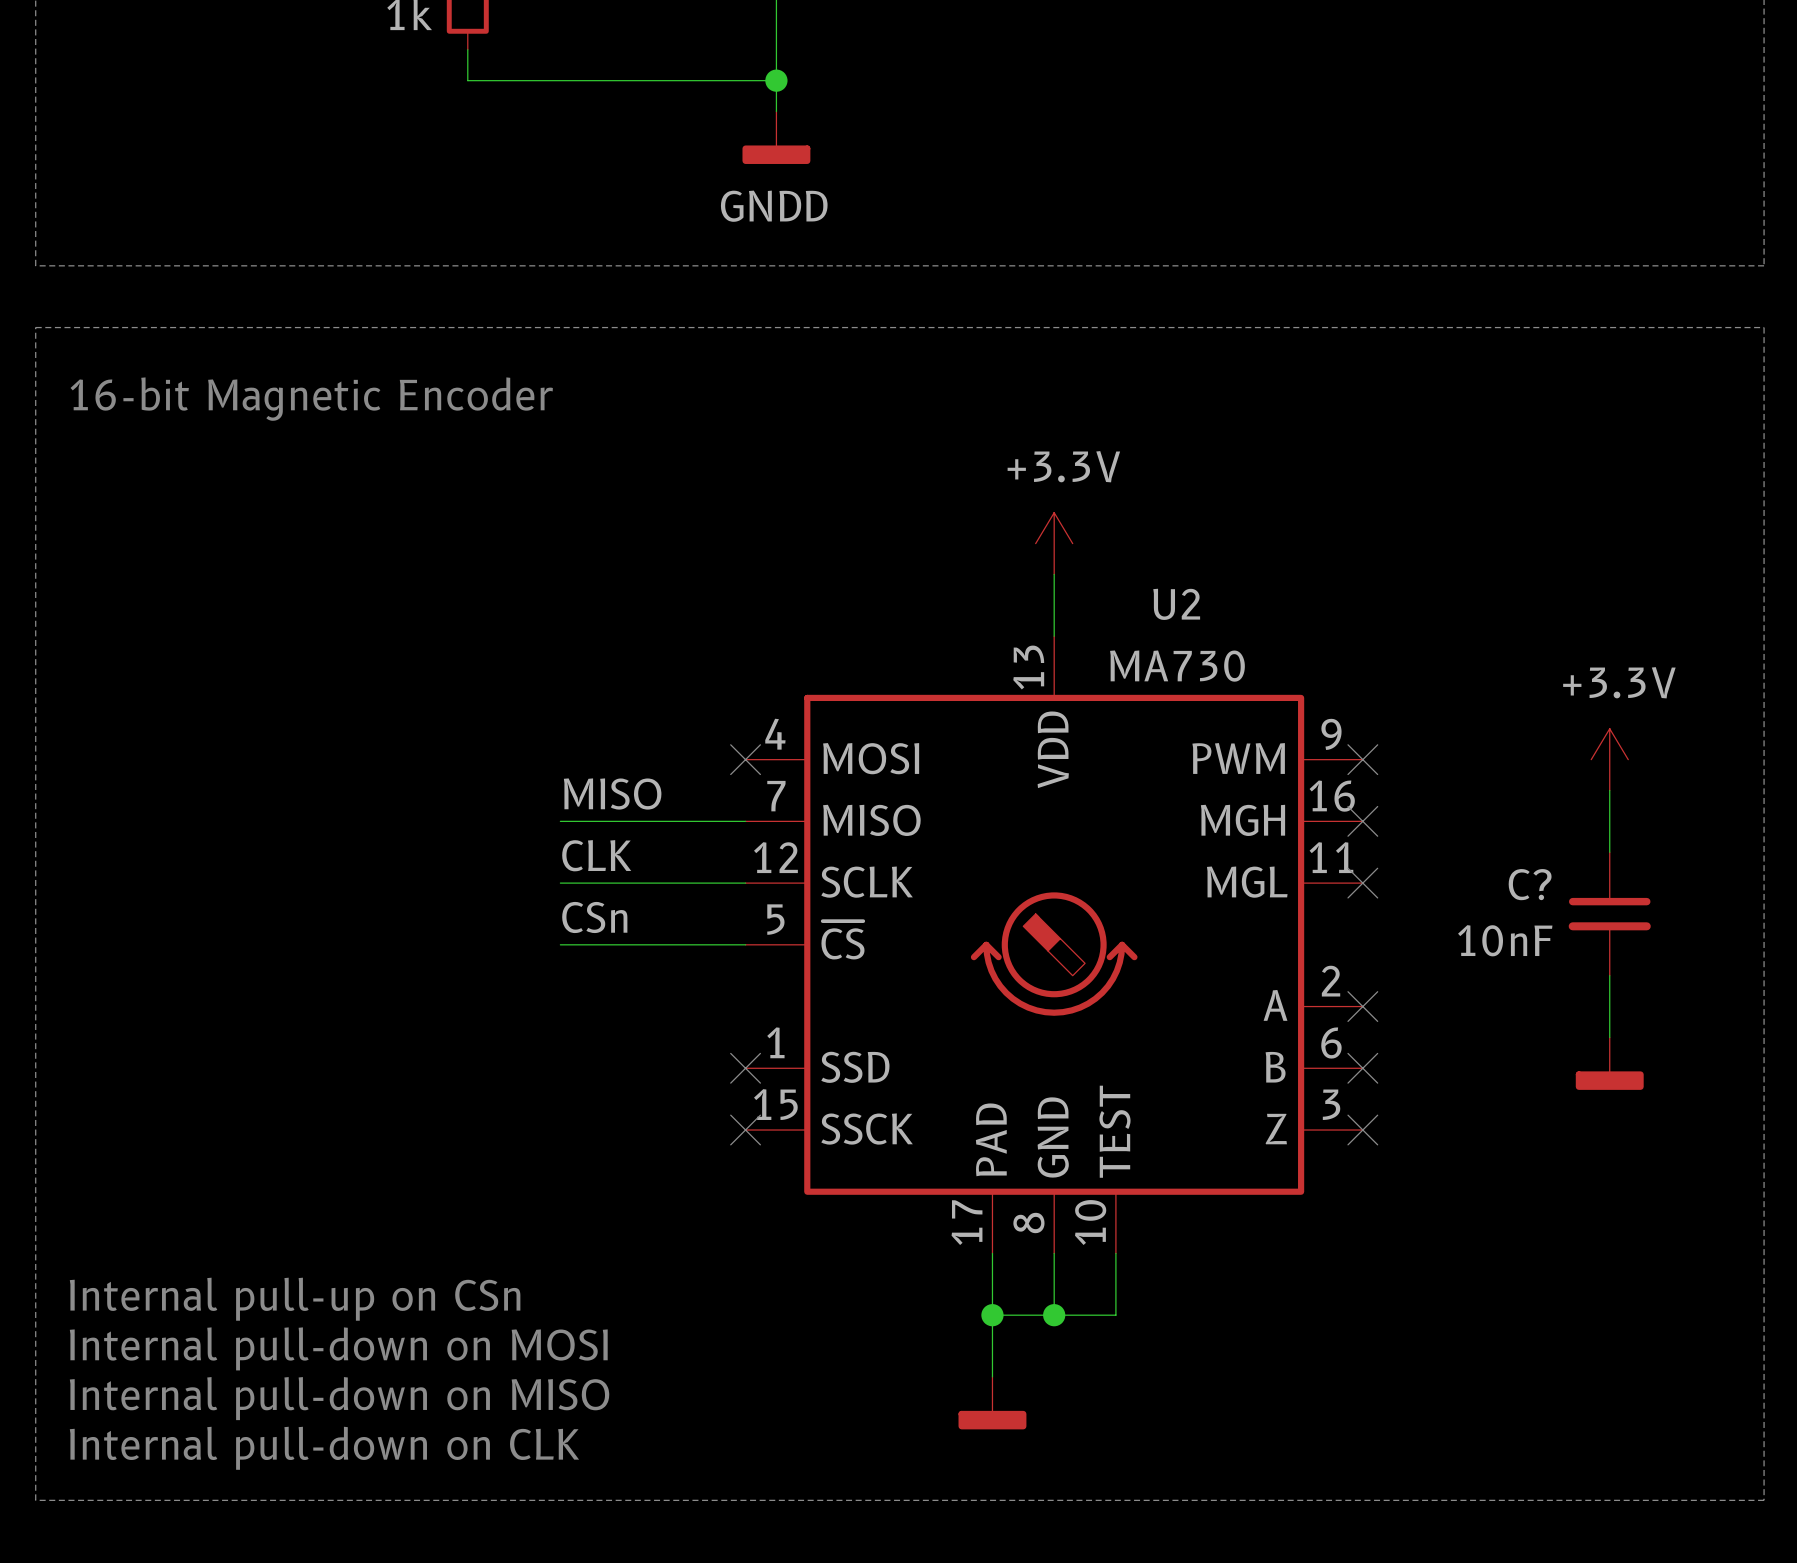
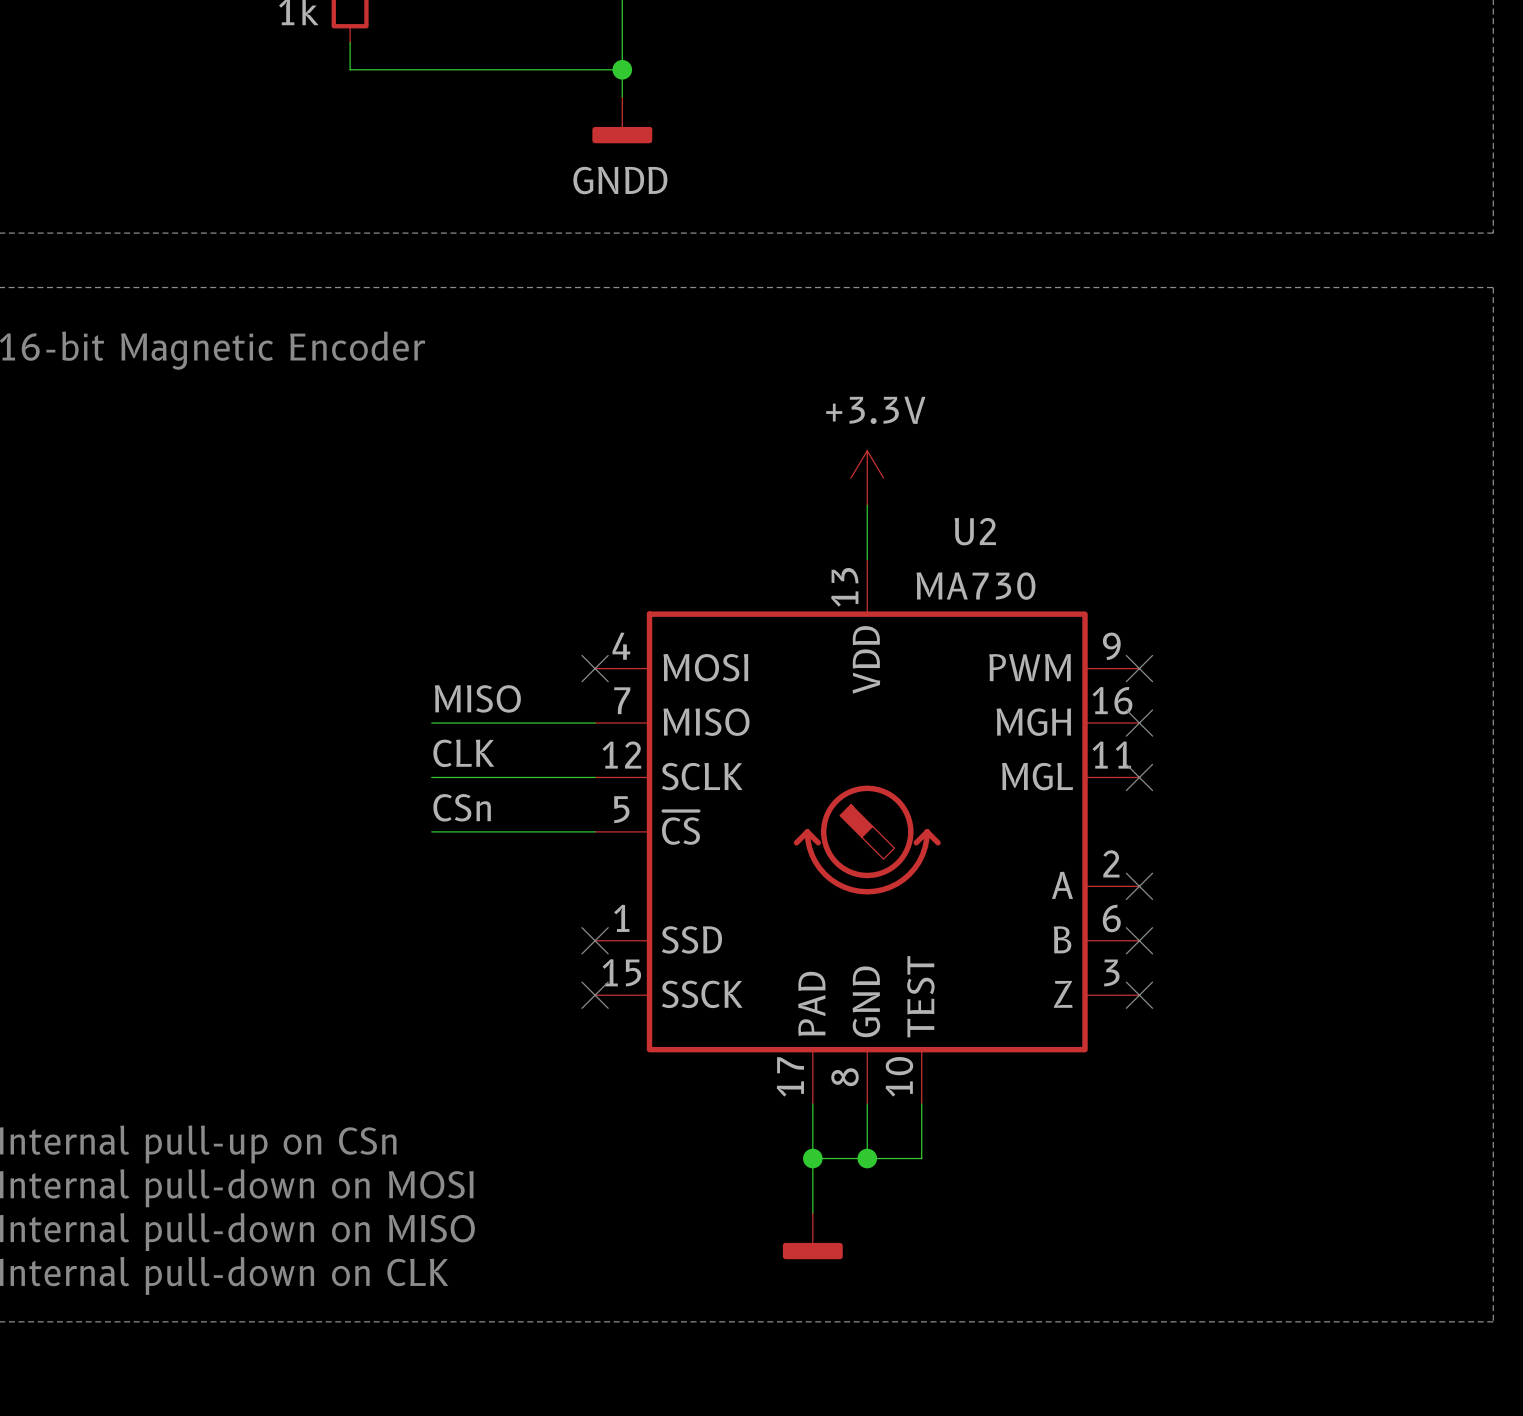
power symbol: +3.3V (1609, 759) -> none
wire: (1609, 790) (1609, 852) -> none
C?: 10nF (1609, 913) -> none
wire: (1609, 975) (1609, 1037) -> none
power symbol: (1609, 1063) -> none

